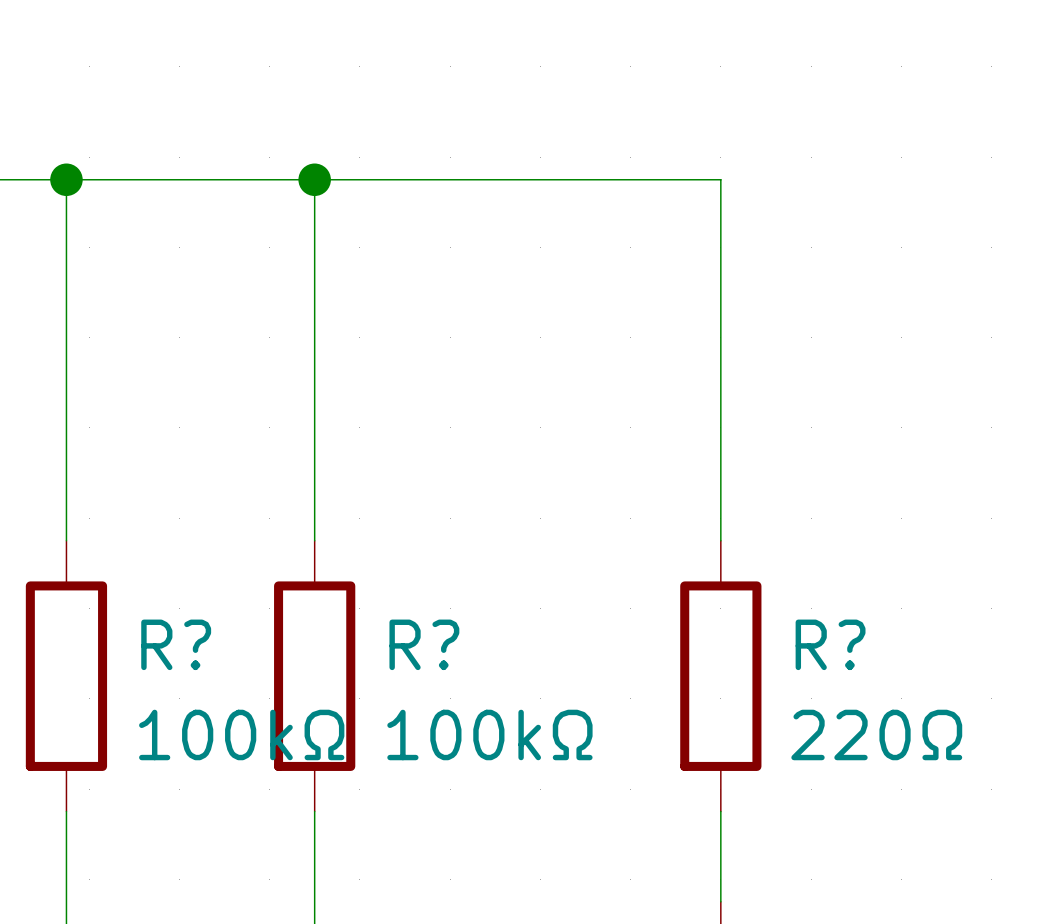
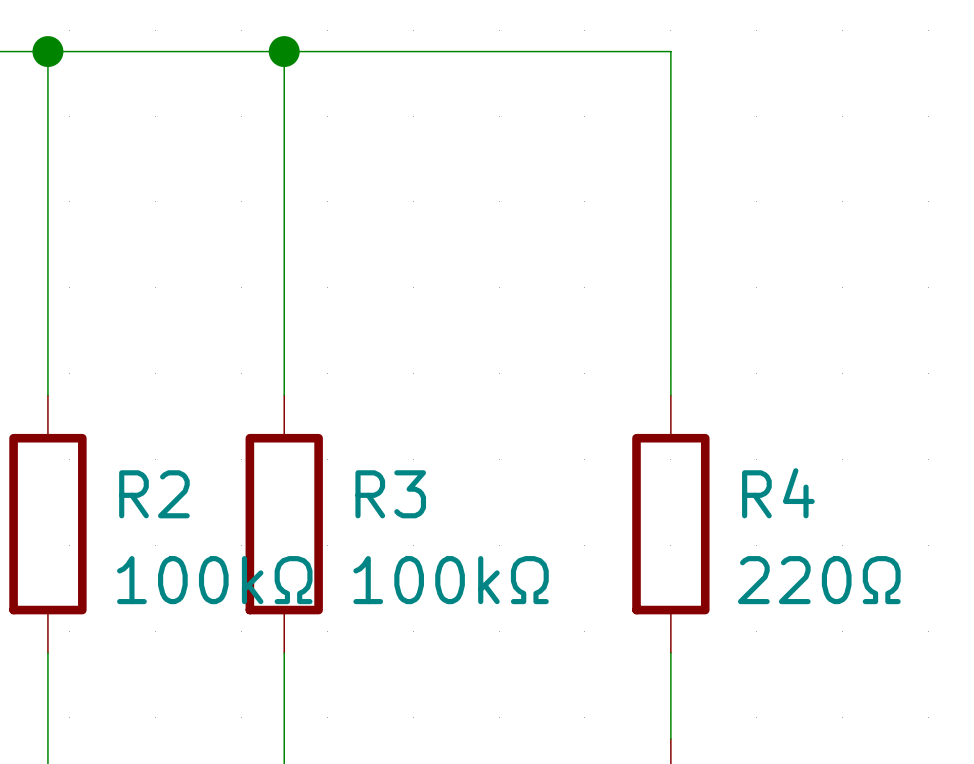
R? name: R? (176, 644) -> R2 (154, 494)
R? name: R? (424, 644) -> R3 (390, 494)
R? name: R? (830, 644) -> R4 (778, 493)

